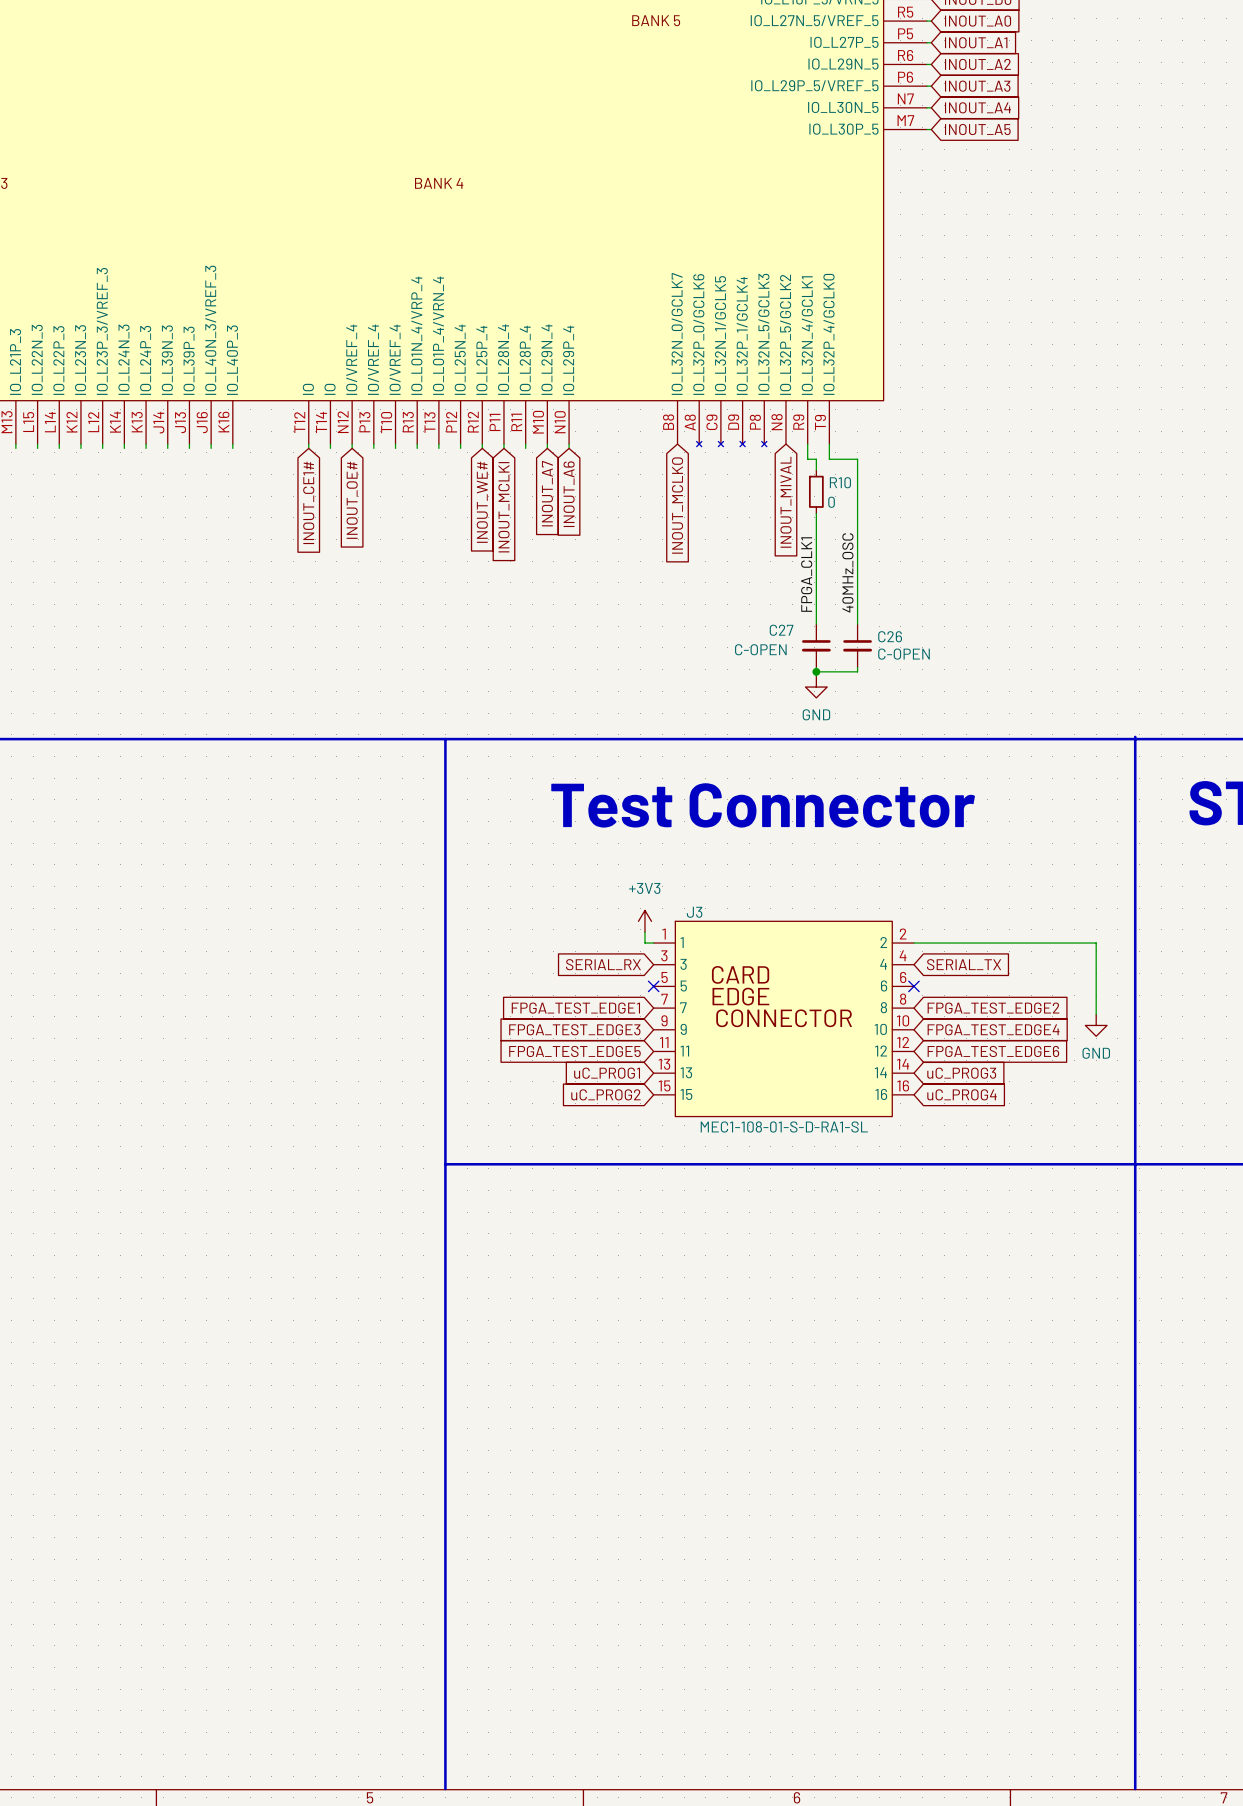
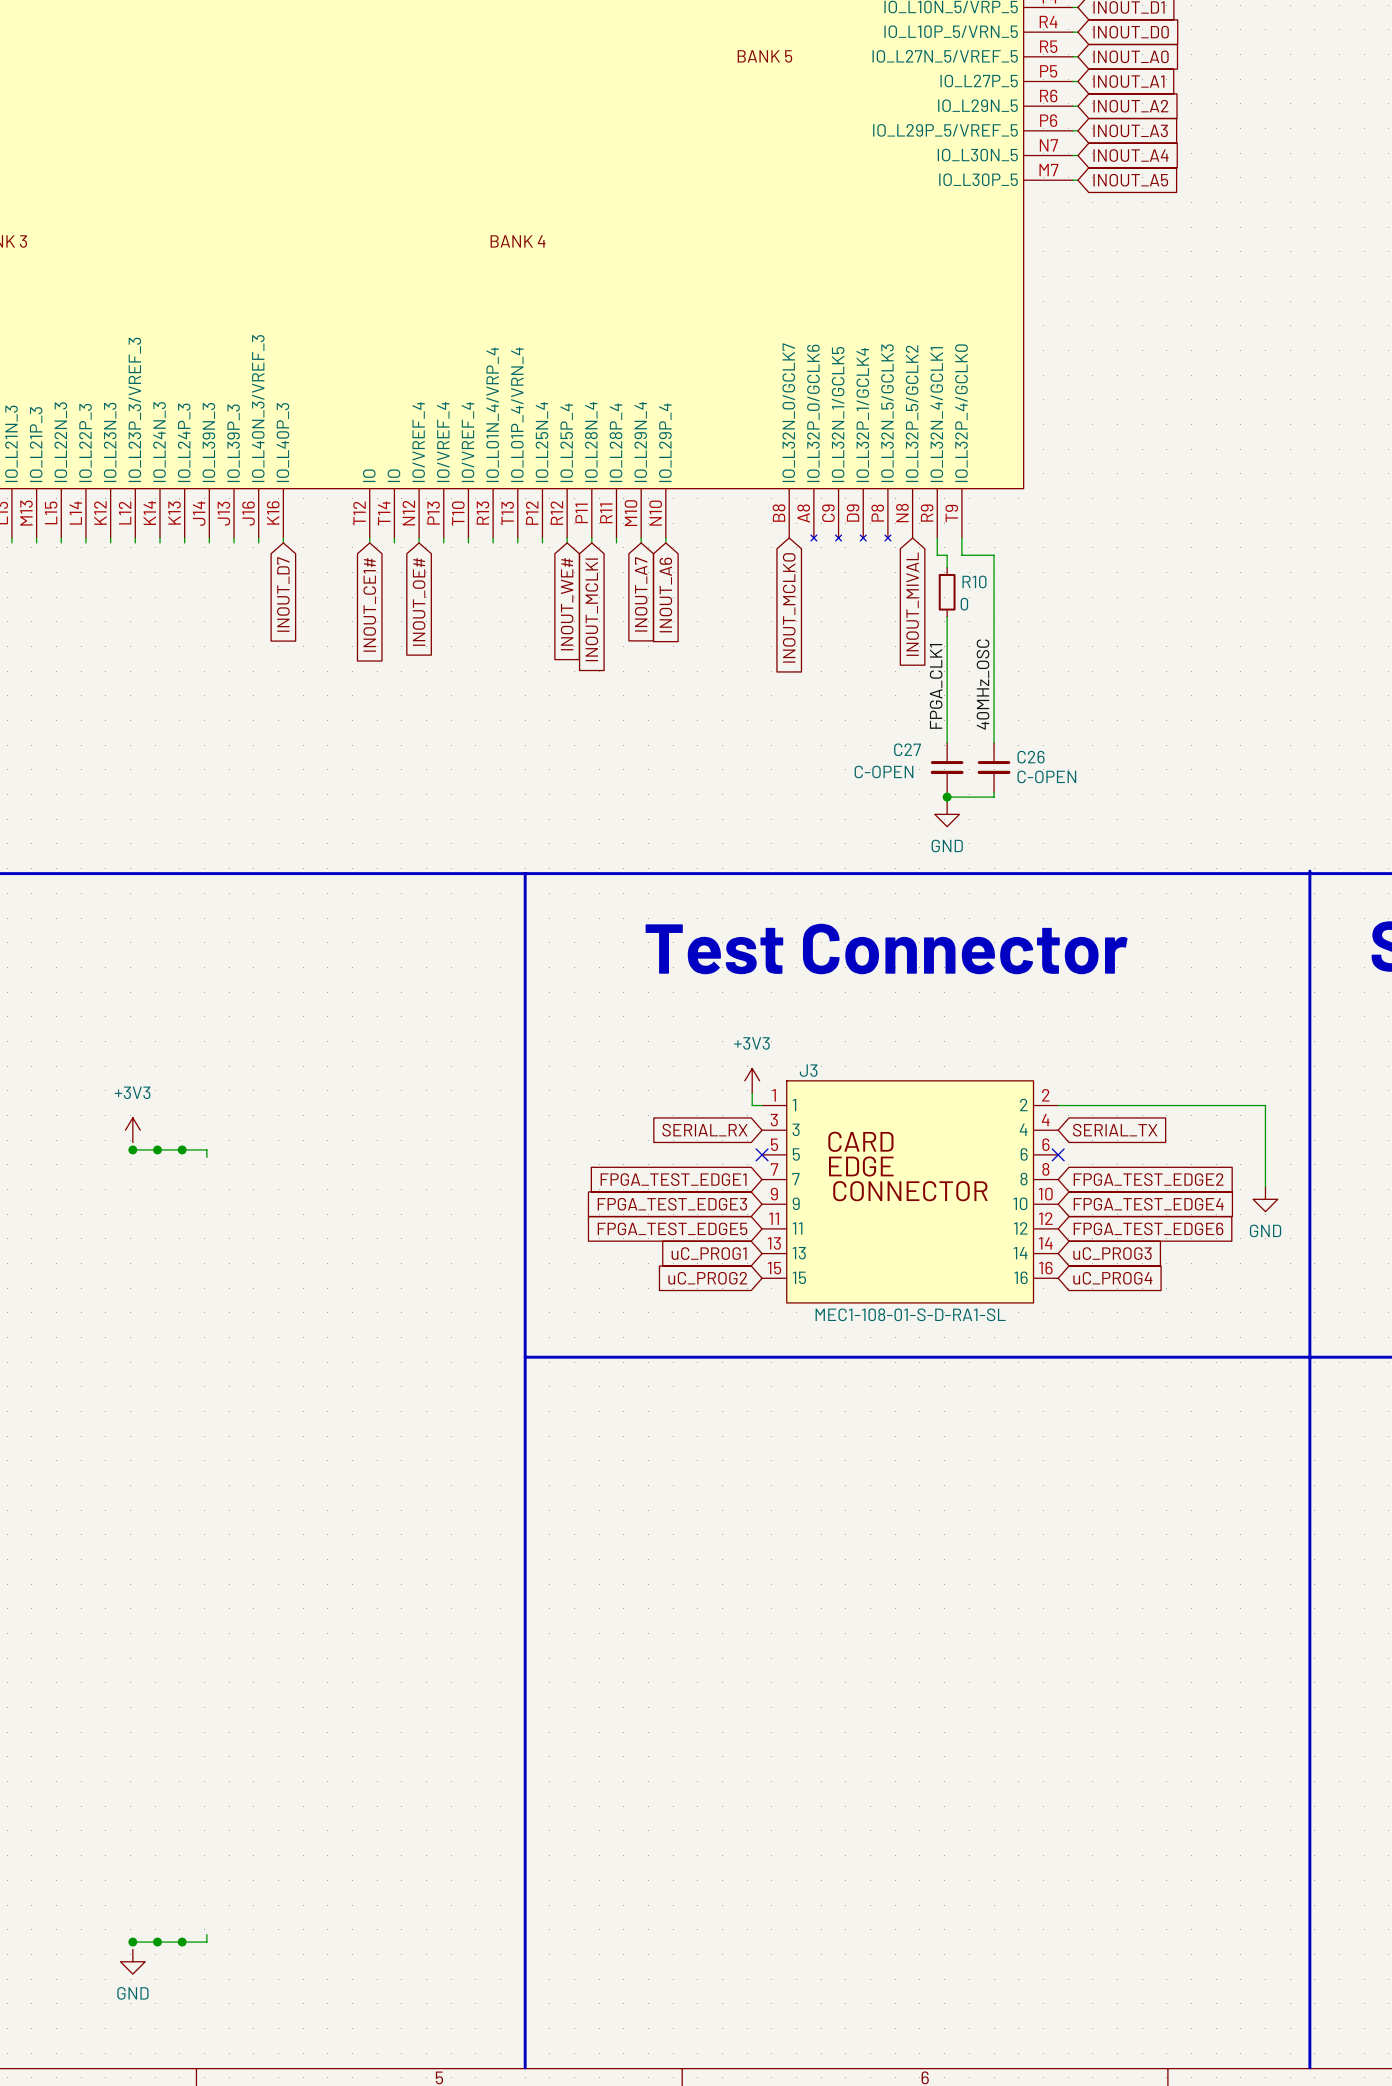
global label: none -> INOUT_D7 (283, 594)
power symbol: none -> +3V3 (132, 1130)
wire: none -> (132, 1149) (206, 1149) (206, 1157)
junction: none -> (132, 1149)
junction: none -> (157, 1149)
junction: none -> (182, 1149)
wire: none -> (206, 1934) (206, 1942) (132, 1942)
junction: none -> (132, 1942)
junction: none -> (157, 1942)
junction: none -> (182, 1942)
power symbol: none -> GND (132, 1961)

